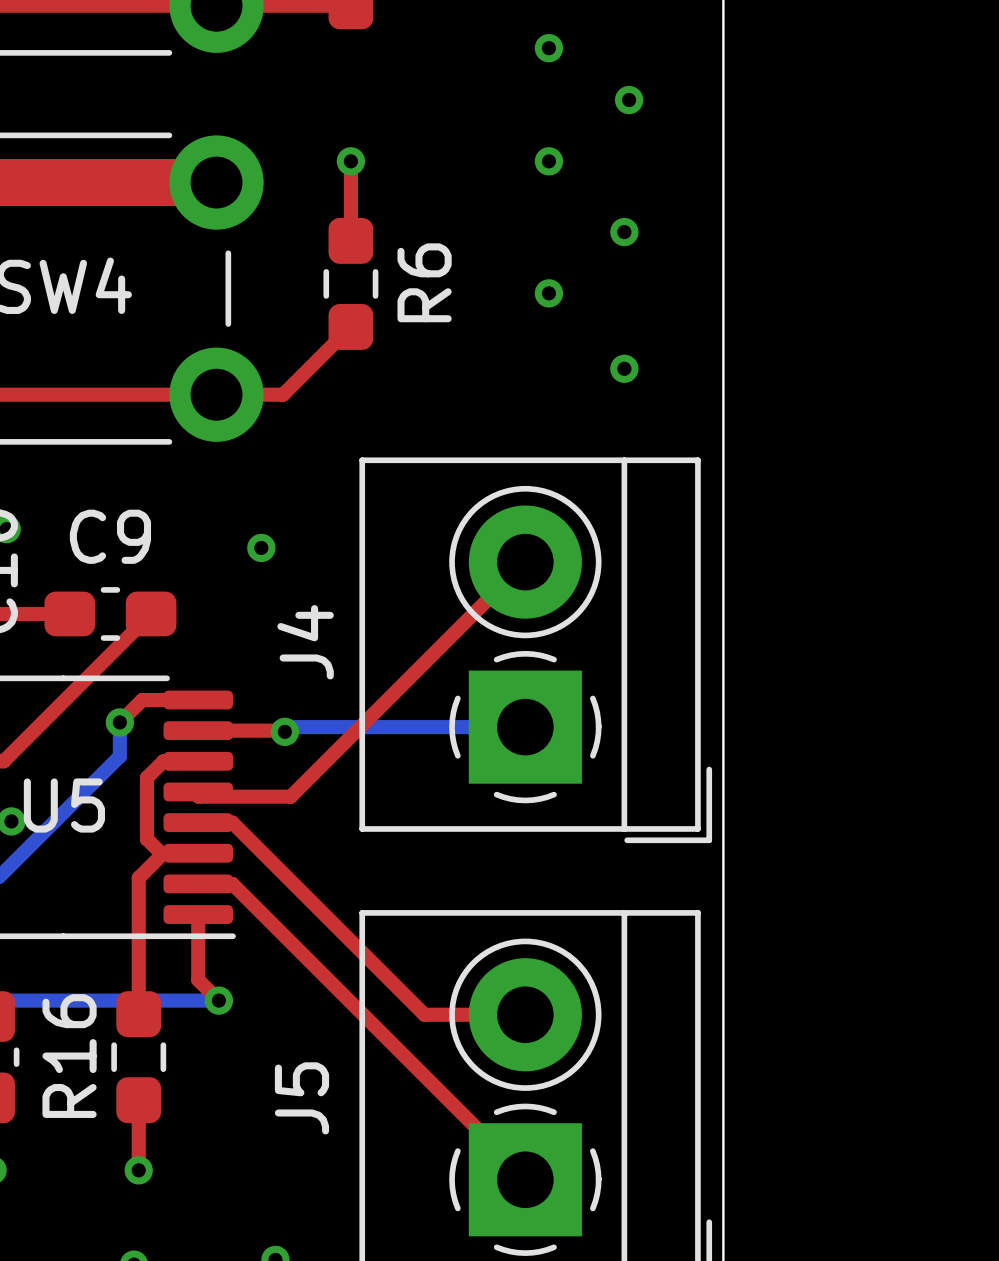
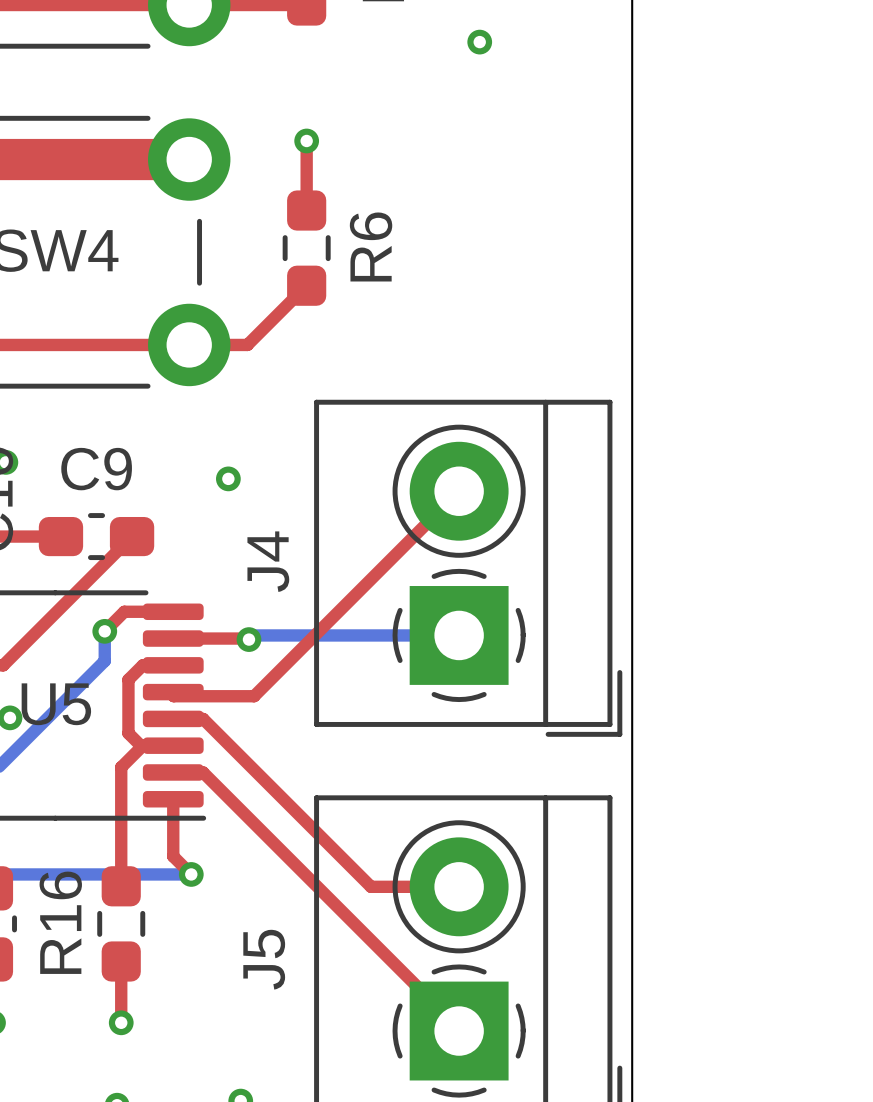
via: (629, 100) -> none
via: (548, 161) -> none
via: (624, 232) -> none
via: (548, 293) -> none
via: (624, 368) -> none

